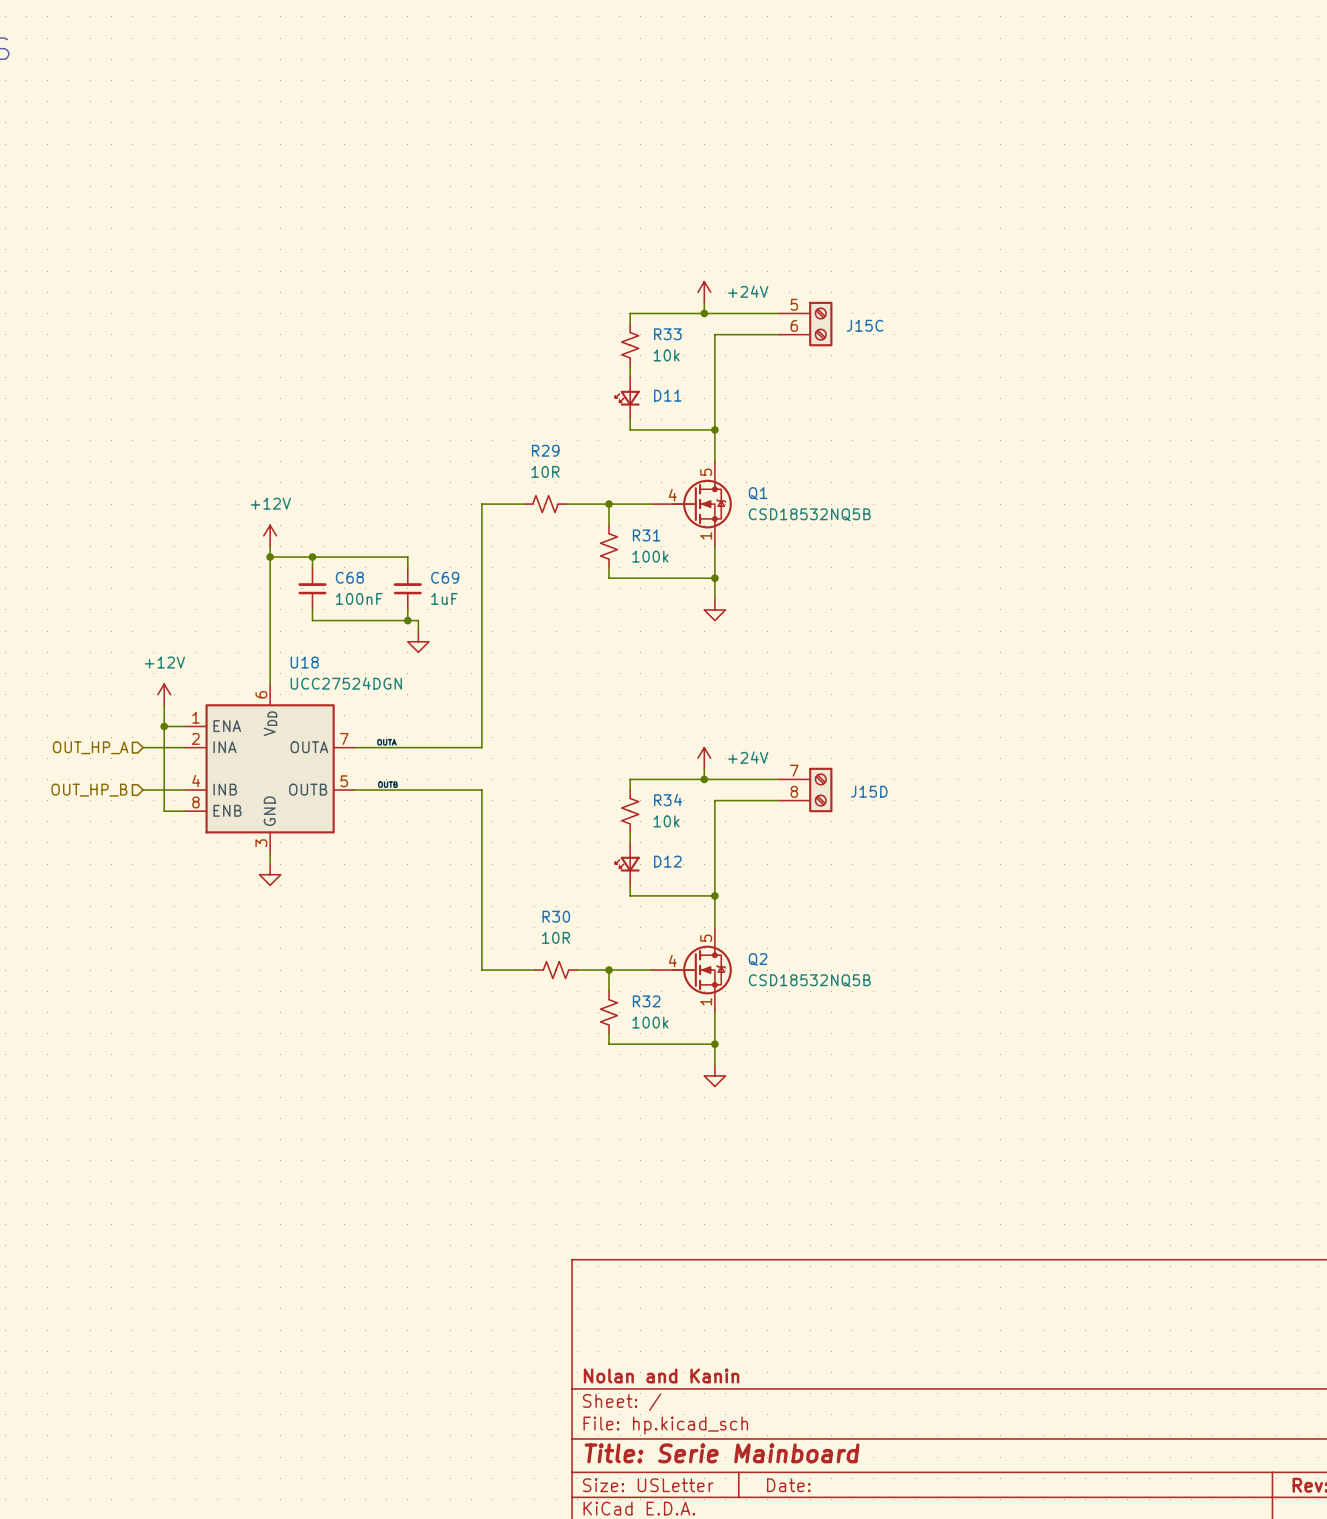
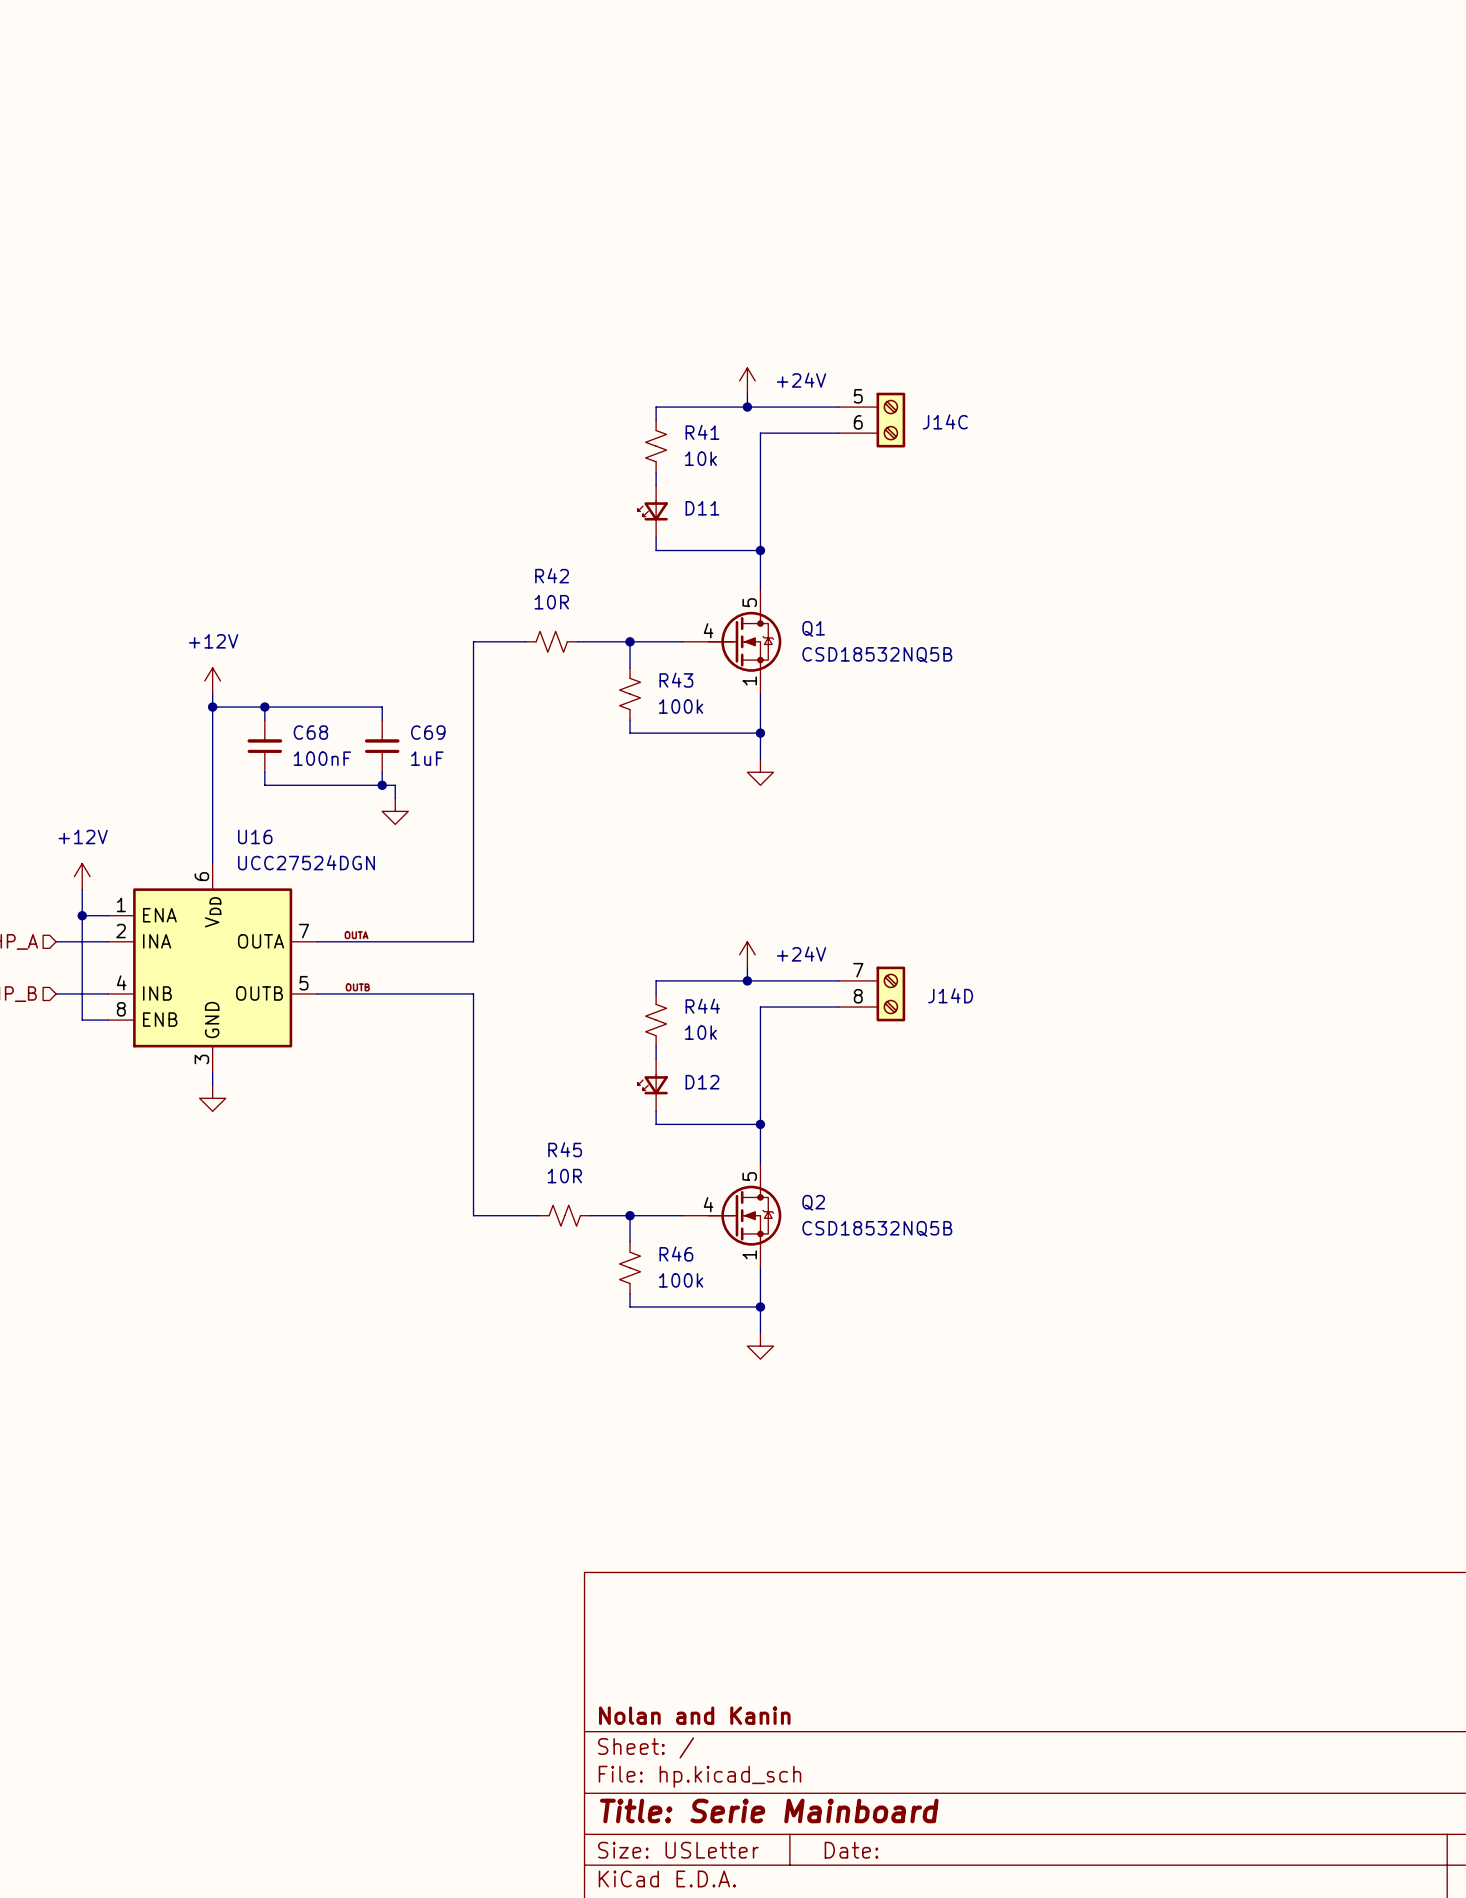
J15C name: J15C (865, 325) -> J14C (945, 421)
R33 name: R33 (667, 334) -> R41 (702, 432)
R29 name: R29 (545, 450) -> R42 (552, 575)
R31 name: R31 (646, 535) -> R43 (676, 680)
U18 name: U18 (304, 662) -> U16 (255, 836)
J15D name: J15D (869, 791) -> J14D (950, 995)
R34 name: R34 (668, 799) -> R44 (702, 1006)
R30 name: R30 (556, 916) -> R45 (565, 1149)
R32 name: R32 (646, 1001) -> R46 (676, 1254)

